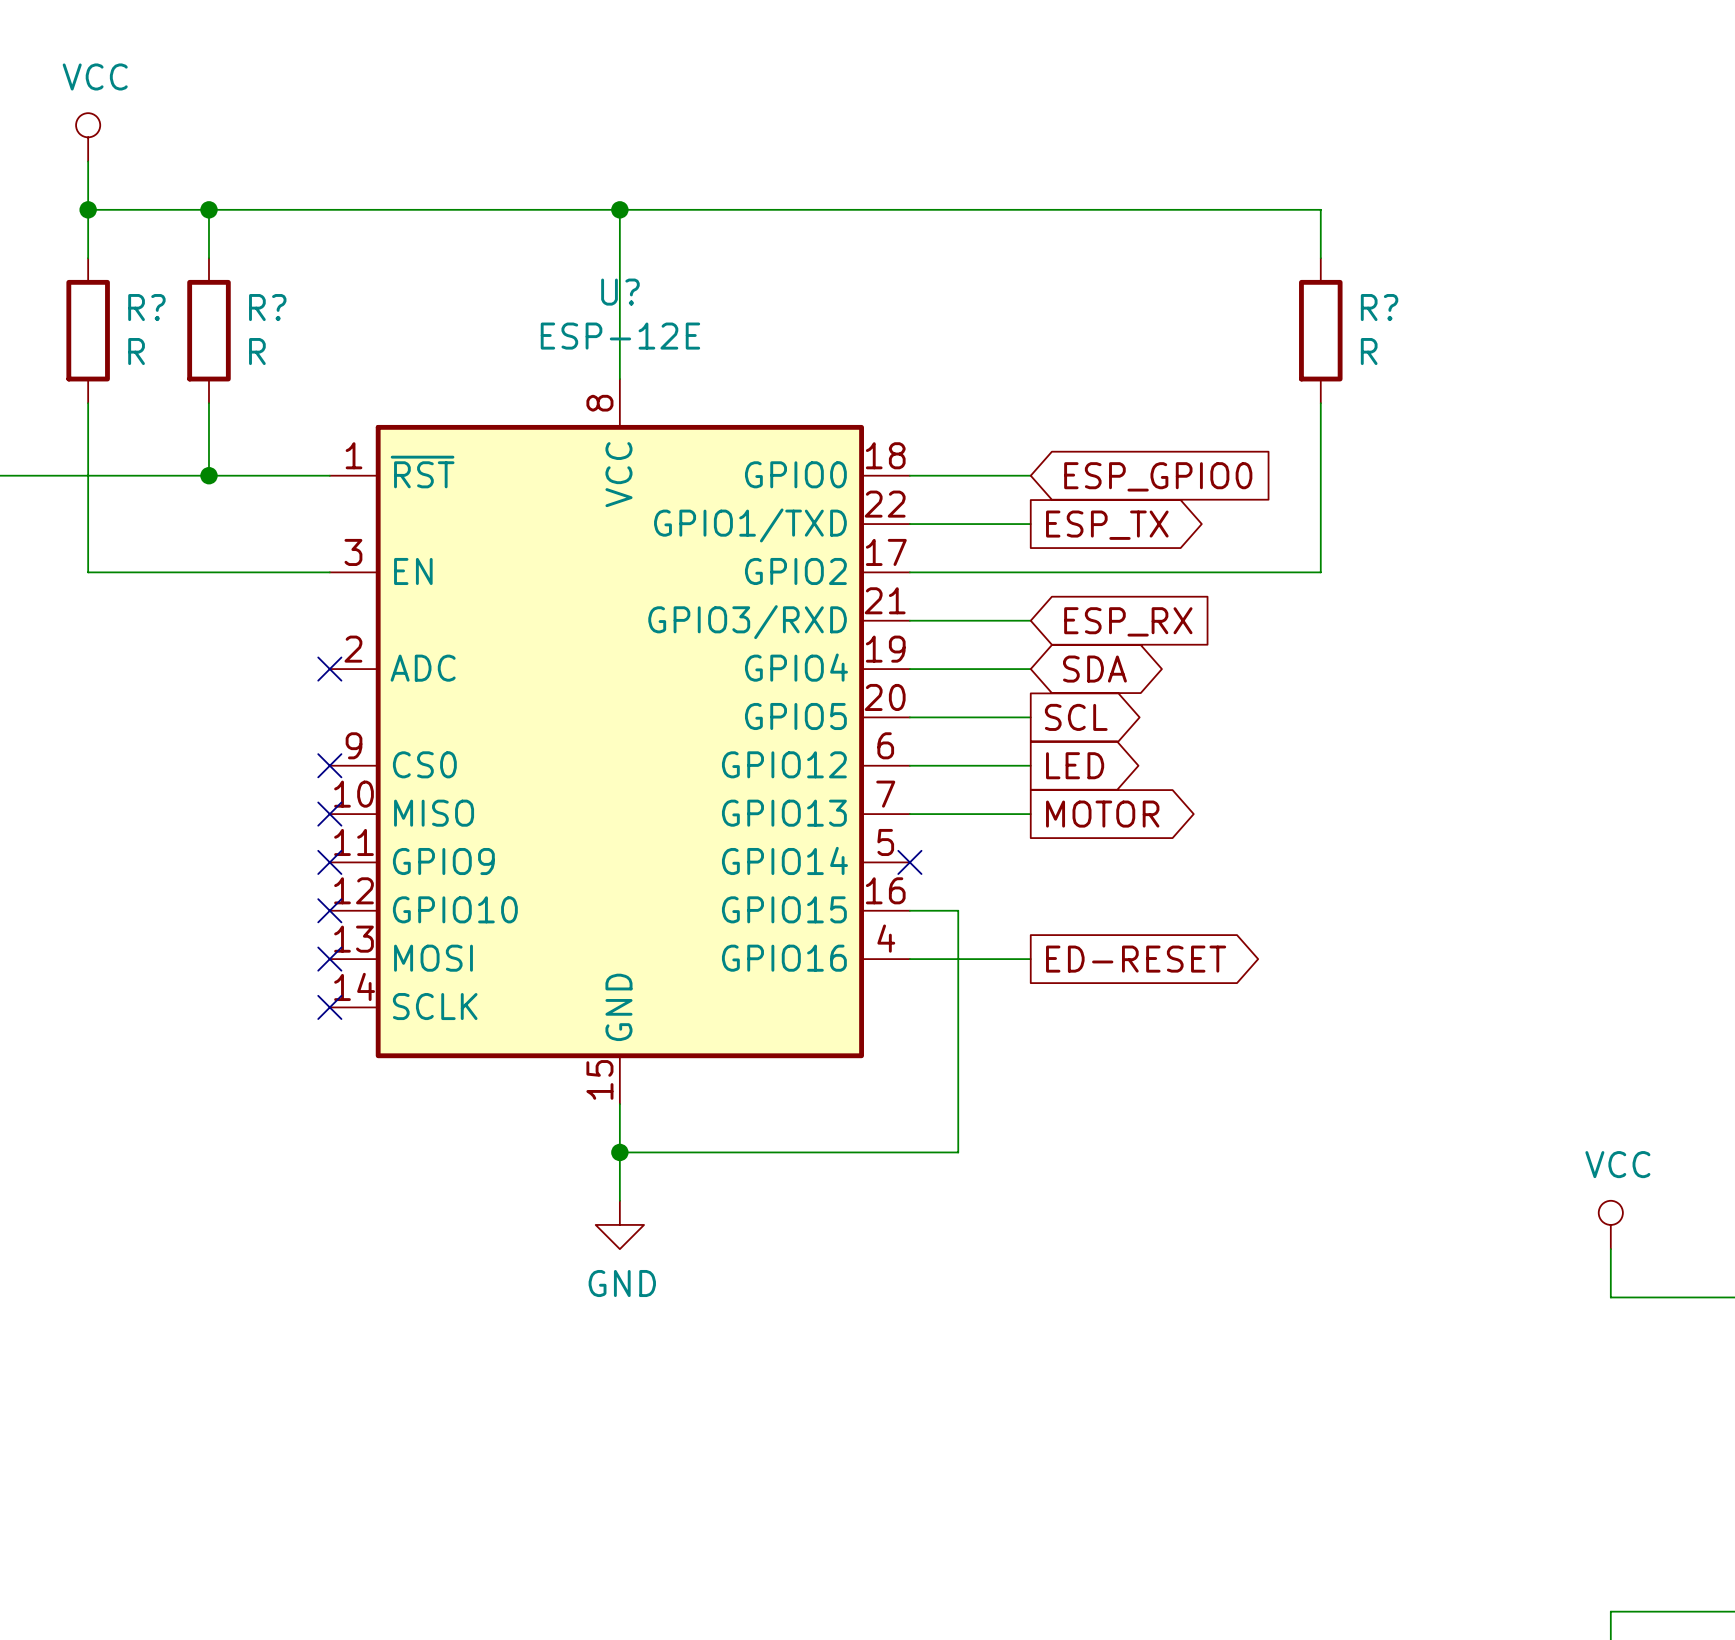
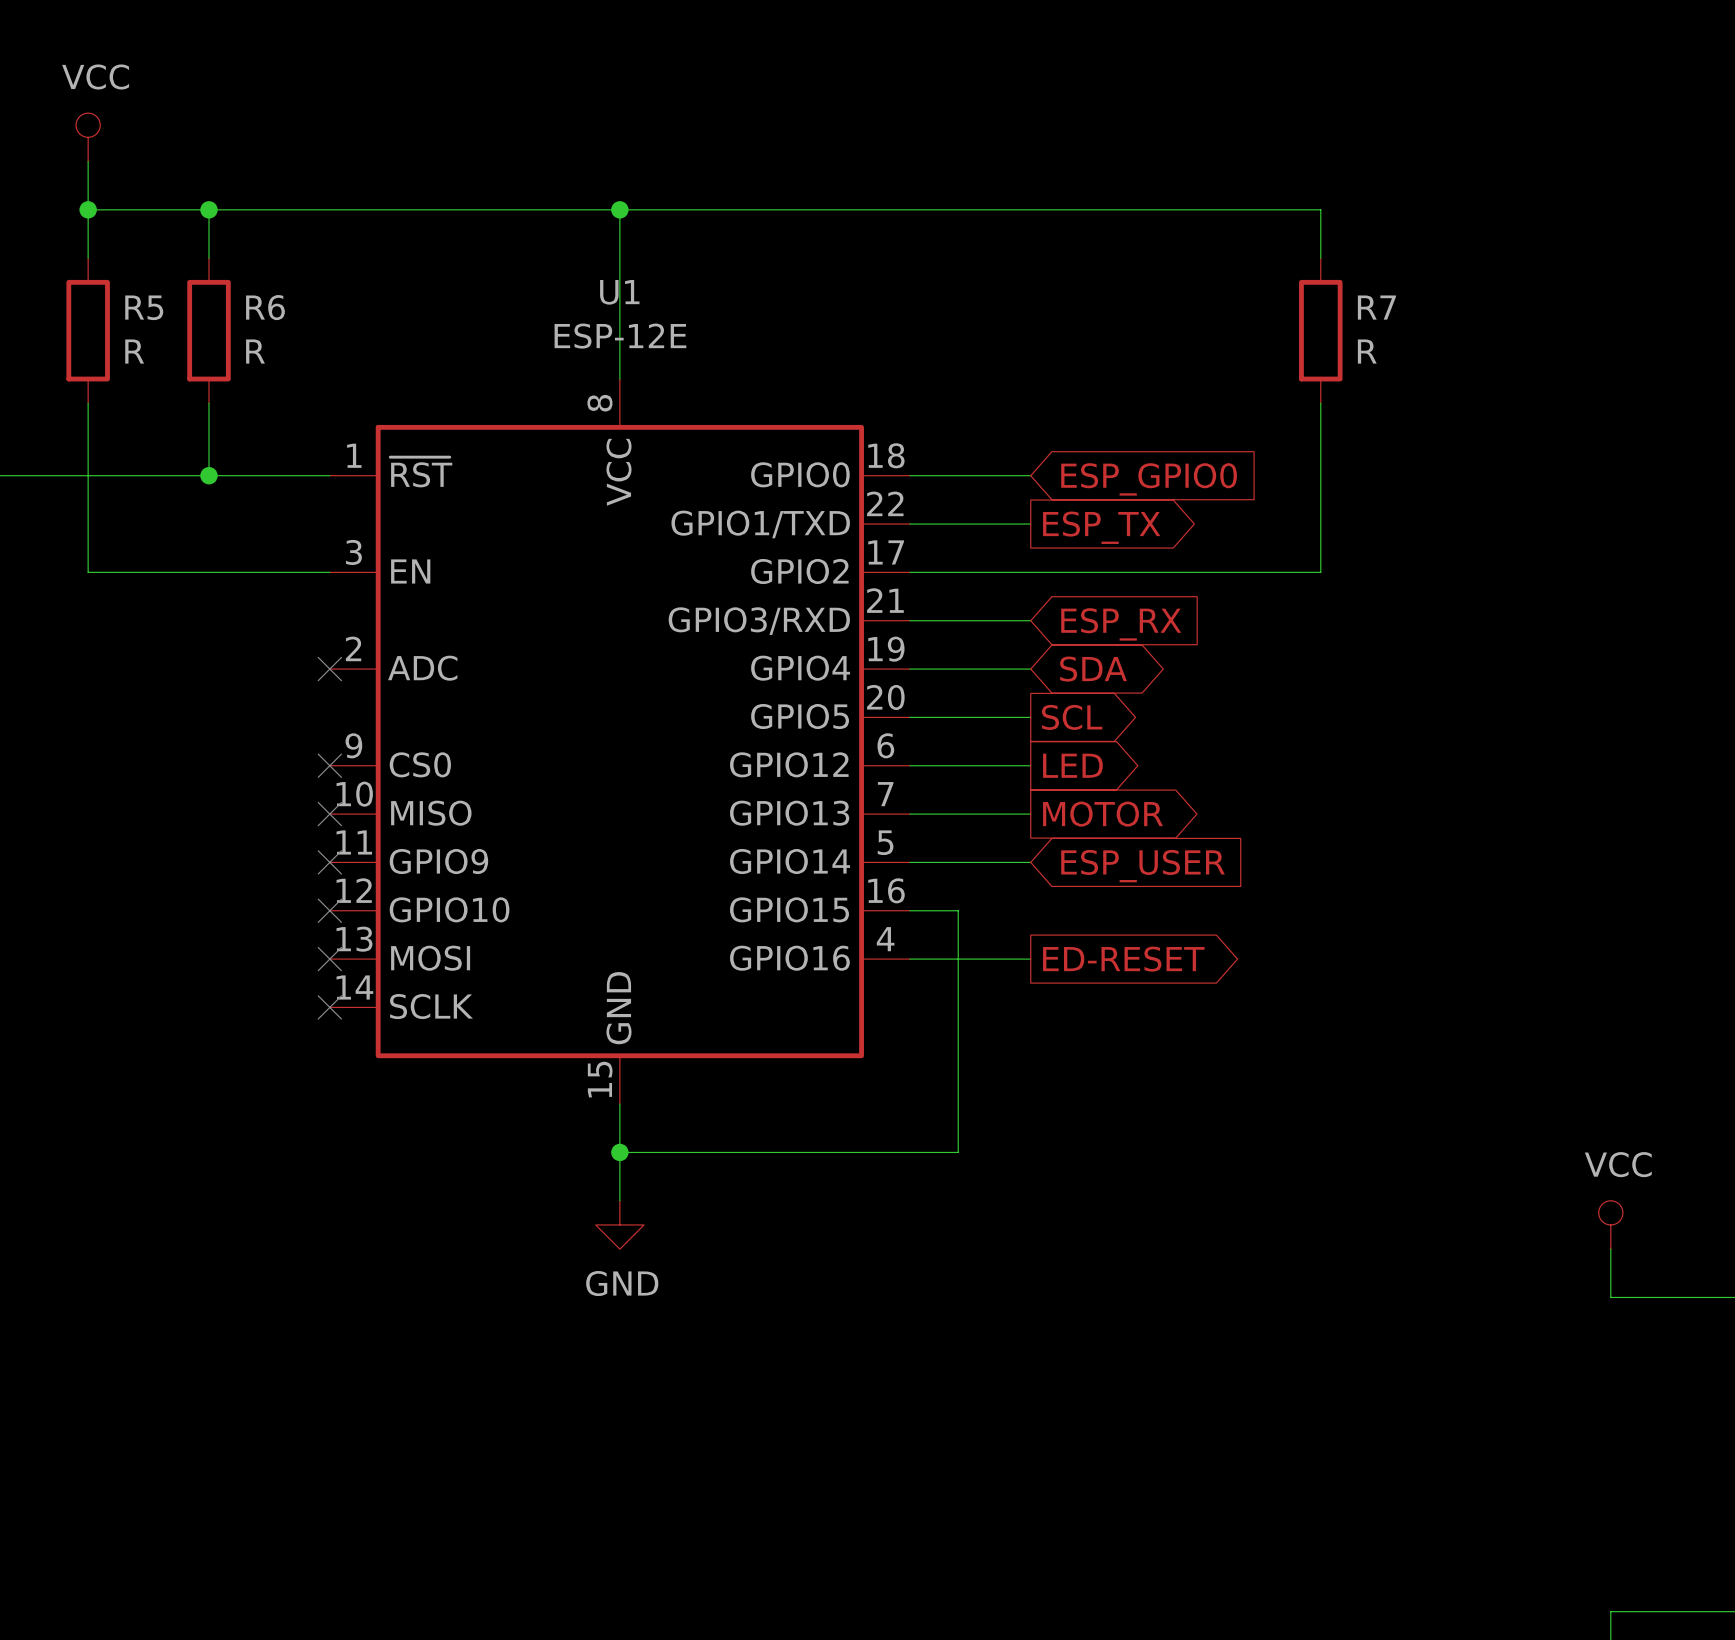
U? name: U? (620, 292) -> U1 (619, 292)
R? name: R? (146, 307) -> R5 (144, 307)
R? name: R? (267, 307) -> R6 (265, 307)
R? name: R? (1379, 307) -> R7 (1376, 307)
wire: none -> (909, 862) (1030, 862)
no-connect mark: (909, 862) -> none
global label: none -> ESP_USER (1143, 866)

